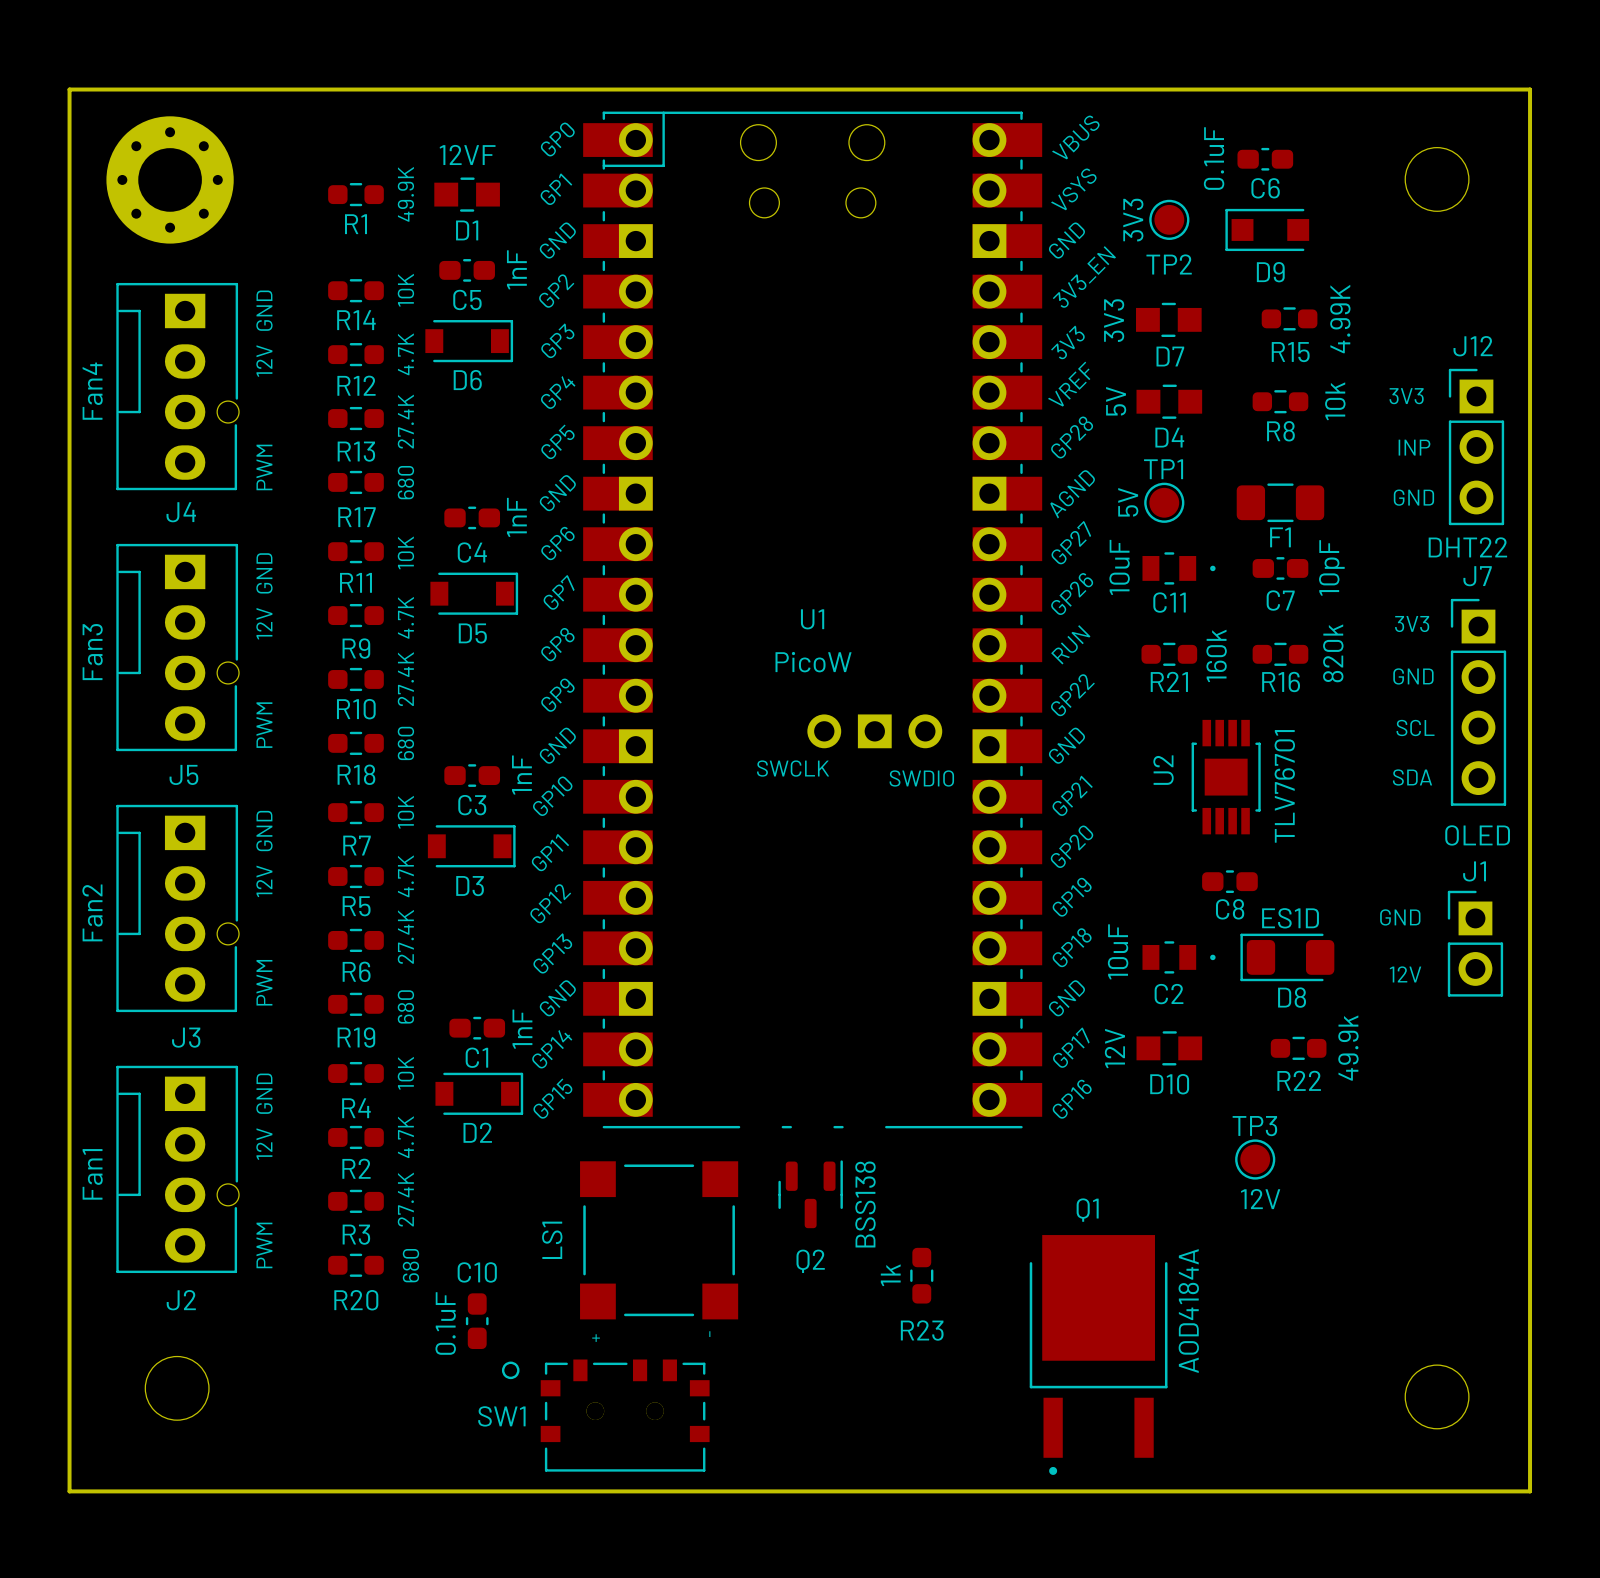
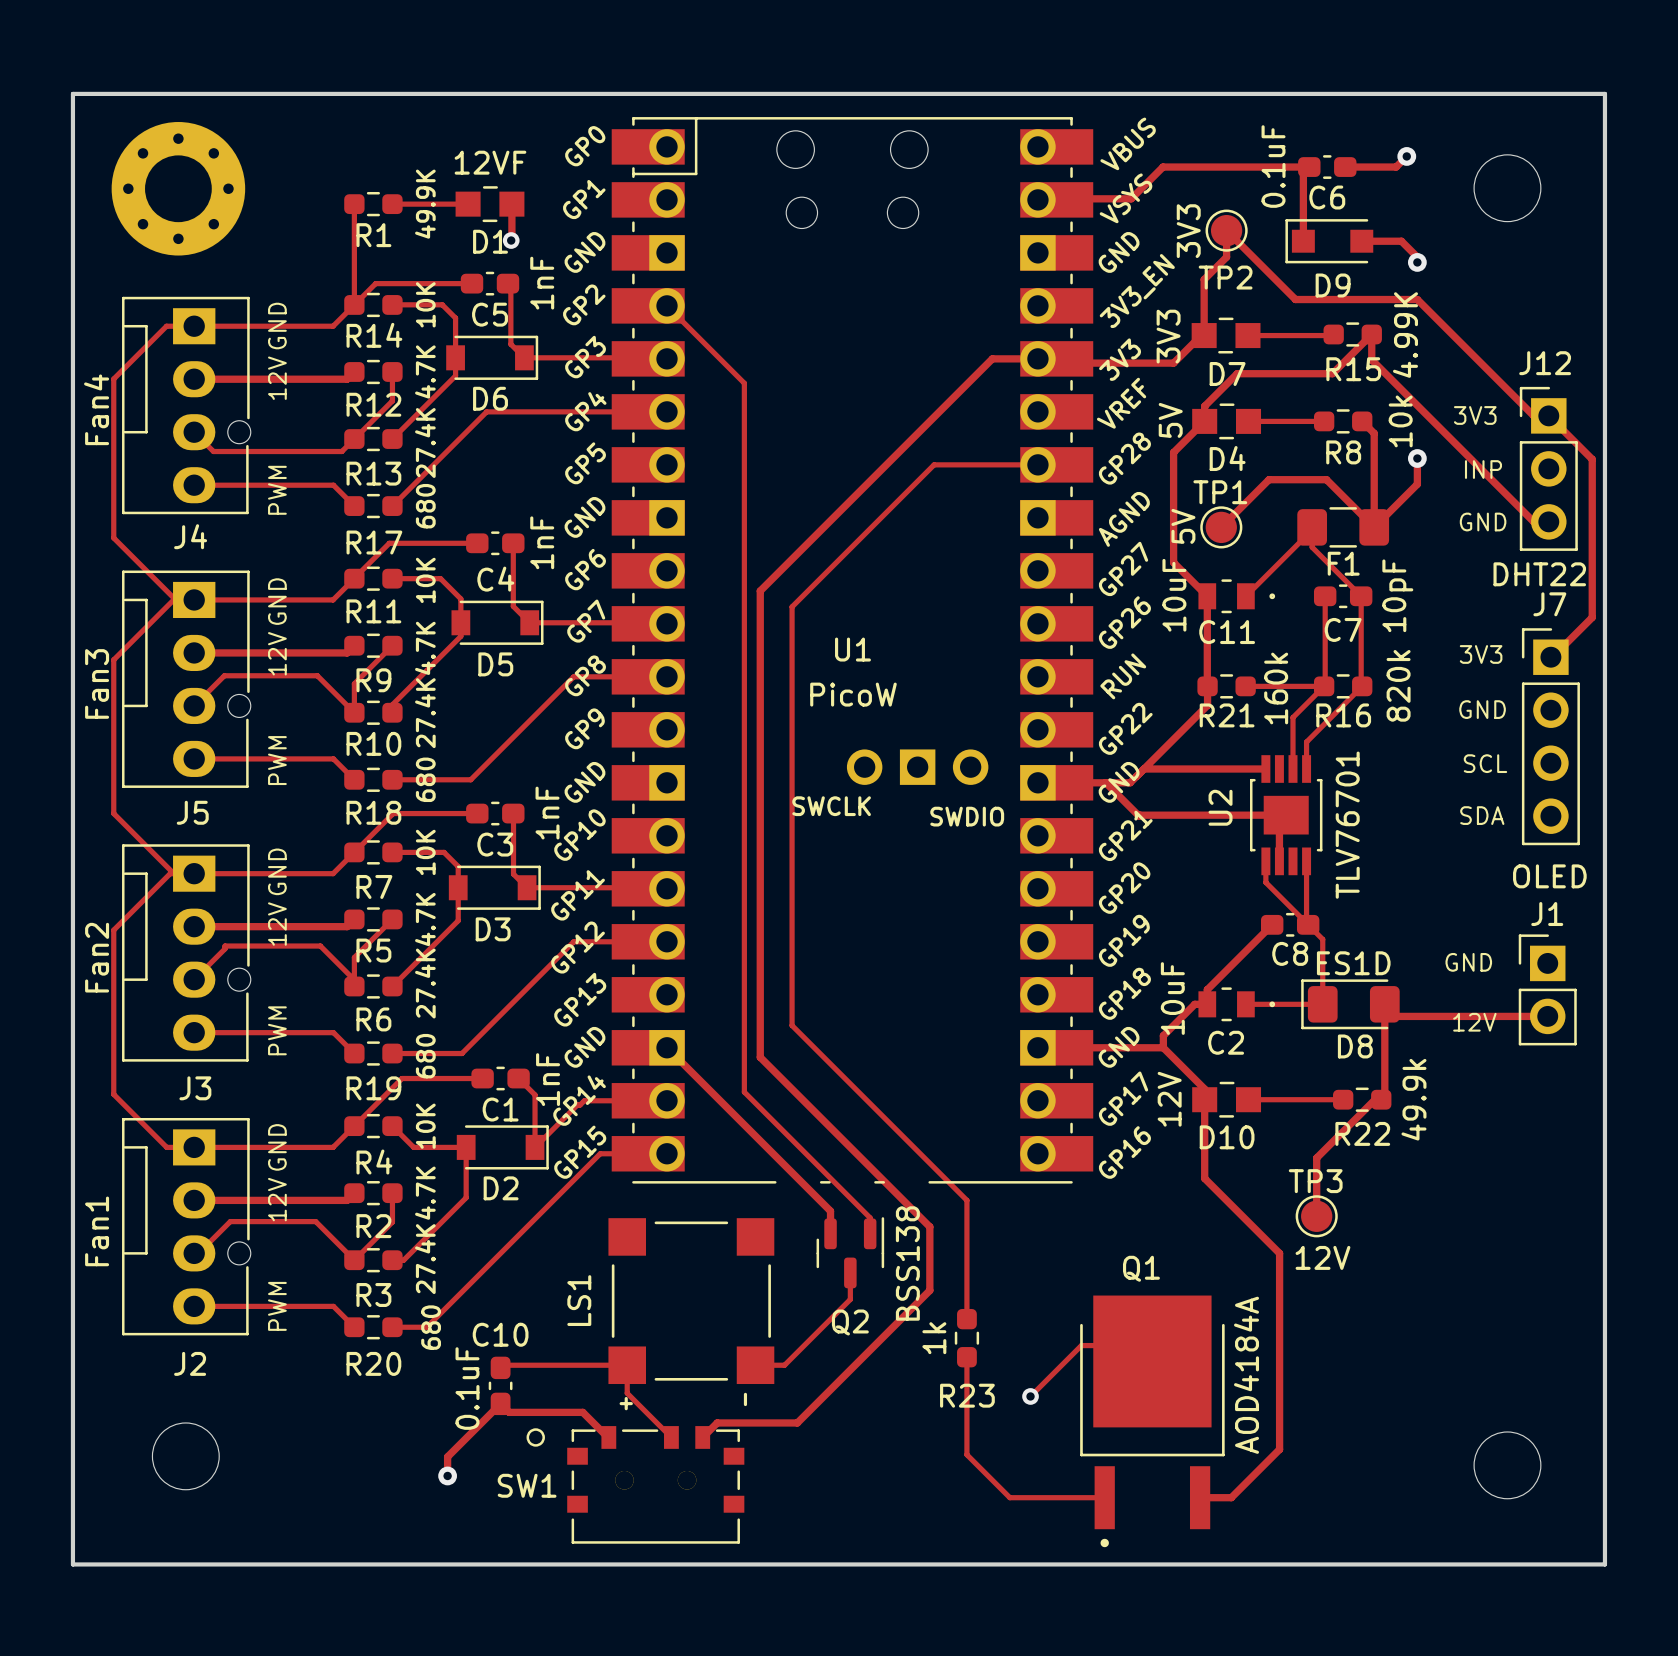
track: none -> (1406, 156) (1396, 167) (1345, 167)
via: none -> (1406, 156)
track: none -> (1037, 199) (1131, 198) (1163, 167) (1309, 167) (1303, 172) (1303, 241)
track: none -> (354, 204) (354, 304)
track: none -> (392, 204) (468, 204)
track: none -> (511, 204) (511, 240)
via: none -> (511, 240)
track: none -> (1361, 241) (1401, 241) (1417, 257) (1417, 262)
via: none -> (1417, 262)
track: none -> (466, 283) (375, 283) (333, 326) (166, 326) (113, 379) (113, 537) (175, 599)
track: none -> (508, 283) (510, 286) (510, 344) (524, 357) (667, 358)
track: none -> (392, 304) (442, 304) (455, 318) (455, 375) (392, 439)
track: none -> (667, 305) (744, 383) (744, 1092) (870, 1217) (870, 1233)
track: none -> (1333, 334) (1247, 335)
track: none -> (354, 371) (347, 379) (194, 379)
track: none -> (392, 371) (392, 400) (341, 451) (213, 451) (194, 432)
track: none -> (667, 411) (486, 411) (392, 506)
track: none -> (1248, 421) (1324, 421)
track: none -> (1362, 421) (1374, 433) (1374, 527)
track: none -> (1417, 458) (1417, 484) (1374, 527)
via: none -> (1417, 458)
track: none -> (1037, 464) (934, 464) (792, 606) (792, 1025) (966, 1200) (966, 1319)
track: none -> (194, 485) (333, 485) (354, 506)
track: none -> (1548, 521) (1533, 521) (1371, 359) (1371, 334) (1332, 373) (1237, 373) (1204, 406) (1204, 421) (1173, 452) (1173, 562) (1207, 596) (1207, 686)
track: none -> (1221, 527) (1268, 479) (1326, 479) (1374, 527)
track: none -> (1312, 527) (1312, 547) (1361, 596) (1362, 686) (1306, 742) (1306, 769)
track: none -> (1312, 530) (1245, 596)
track: none -> (477, 543) (389, 543) (333, 599) (173, 599) (113, 659) (113, 813) (173, 873)
track: none -> (513, 543) (513, 606) (529, 622) (667, 623)
track: none -> (392, 578) (440, 578) (460, 598) (460, 636) (392, 704) (392, 712)
track: none -> (1325, 596) (1325, 685) (1293, 717) (1293, 769)
track: none -> (354, 645) (347, 652) (194, 652)
track: none -> (392, 645) (354, 683) (354, 712) (317, 675) (224, 675) (194, 705)
track: none -> (1550, 657) (1592, 617) (1592, 459) (1548, 415) (1533, 415) (1417, 299) (1295, 299) (1226, 230) (1226, 257) (1204, 279) (1204, 335) (1201, 335) (1173, 363) (1042, 363) (1037, 358) (992, 358) (760, 590) (760, 1057) (929, 1226) (929, 1290) (797, 1422) (717, 1422) (702, 1437)
track: none -> (667, 676) (573, 676) (470, 779) (392, 779)
track: none -> (1207, 686) (1207, 705) (1130, 782) (1037, 782)
track: none -> (1245, 686) (1324, 686)
track: none -> (194, 758) (333, 758) (354, 779)
track: none -> (1143, 769) (1265, 769)
track: none -> (1105, 782) (1139, 816) (1286, 815) (1279, 821) (1279, 861)
track: none -> (477, 813) (393, 813) (333, 873) (170, 873) (113, 930) (113, 1094) (166, 1147) (333, 1147) (401, 1078) (482, 1078)
track: none -> (513, 813) (513, 874) (527, 887) (667, 888)
track: none -> (392, 852) (444, 852) (458, 866) (458, 920) (392, 986)
track: none -> (1265, 861) (1265, 882) (1322, 939) (1322, 1004) (1245, 1004)
track: none -> (1306, 861) (1306, 923)
track: none -> (354, 919) (347, 926) (194, 926)
track: none -> (392, 919) (354, 957) (354, 986)
track: none -> (1272, 924) (1207, 989) (1207, 1004) (1194, 1004) (1163, 1035) (1163, 1047)
track: none -> (667, 941) (573, 941) (462, 1053) (392, 1053)
track: none -> (194, 979) (225, 948) (225, 946) (320, 946) (354, 979)
track: none -> (1547, 1016) (1396, 1016) (1384, 1004) (1384, 1096) (1381, 1099) (1374, 1099) (1316, 1158) (1316, 1216)
track: none -> (194, 1032) (333, 1032) (354, 1053)
track: none -> (667, 1047) (830, 1211) (830, 1233)
track: none -> (1037, 1047) (1163, 1047)
track: none -> (1163, 1047) (1204, 1089) (1204, 1178) (1279, 1253) (1279, 1449) (1231, 1497) (1200, 1497)
track: none -> (518, 1078) (535, 1094) (535, 1147) (577, 1105) (584, 1100) (667, 1100)
track: none -> (1248, 1099) (1343, 1099)
track: none -> (392, 1126) (413, 1147) (466, 1147) (466, 1197) (403, 1260) (392, 1260)
track: none -> (667, 1153) (600, 1153) (426, 1327) (392, 1327)
track: none -> (354, 1193) (347, 1200) (194, 1200)
track: none -> (392, 1193) (392, 1222) (354, 1260) (315, 1221) (230, 1221) (198, 1253) (194, 1253)
track: none -> (850, 1272) (850, 1299) (784, 1365) (755, 1365)
track: none -> (194, 1306) (333, 1306) (354, 1327)
track: none -> (966, 1357) (966, 1454) (1009, 1497) (1104, 1497)
track: none -> (1152, 1361) (1136, 1345) (1081, 1345) (1030, 1396)
track: none -> (500, 1367) (503, 1365) (627, 1365) (627, 1393) (671, 1437)
via: none -> (1030, 1396)
track: none -> (608, 1437) (582, 1412) (509, 1412) (500, 1403) (447, 1456) (447, 1475)
via: none -> (447, 1475)

